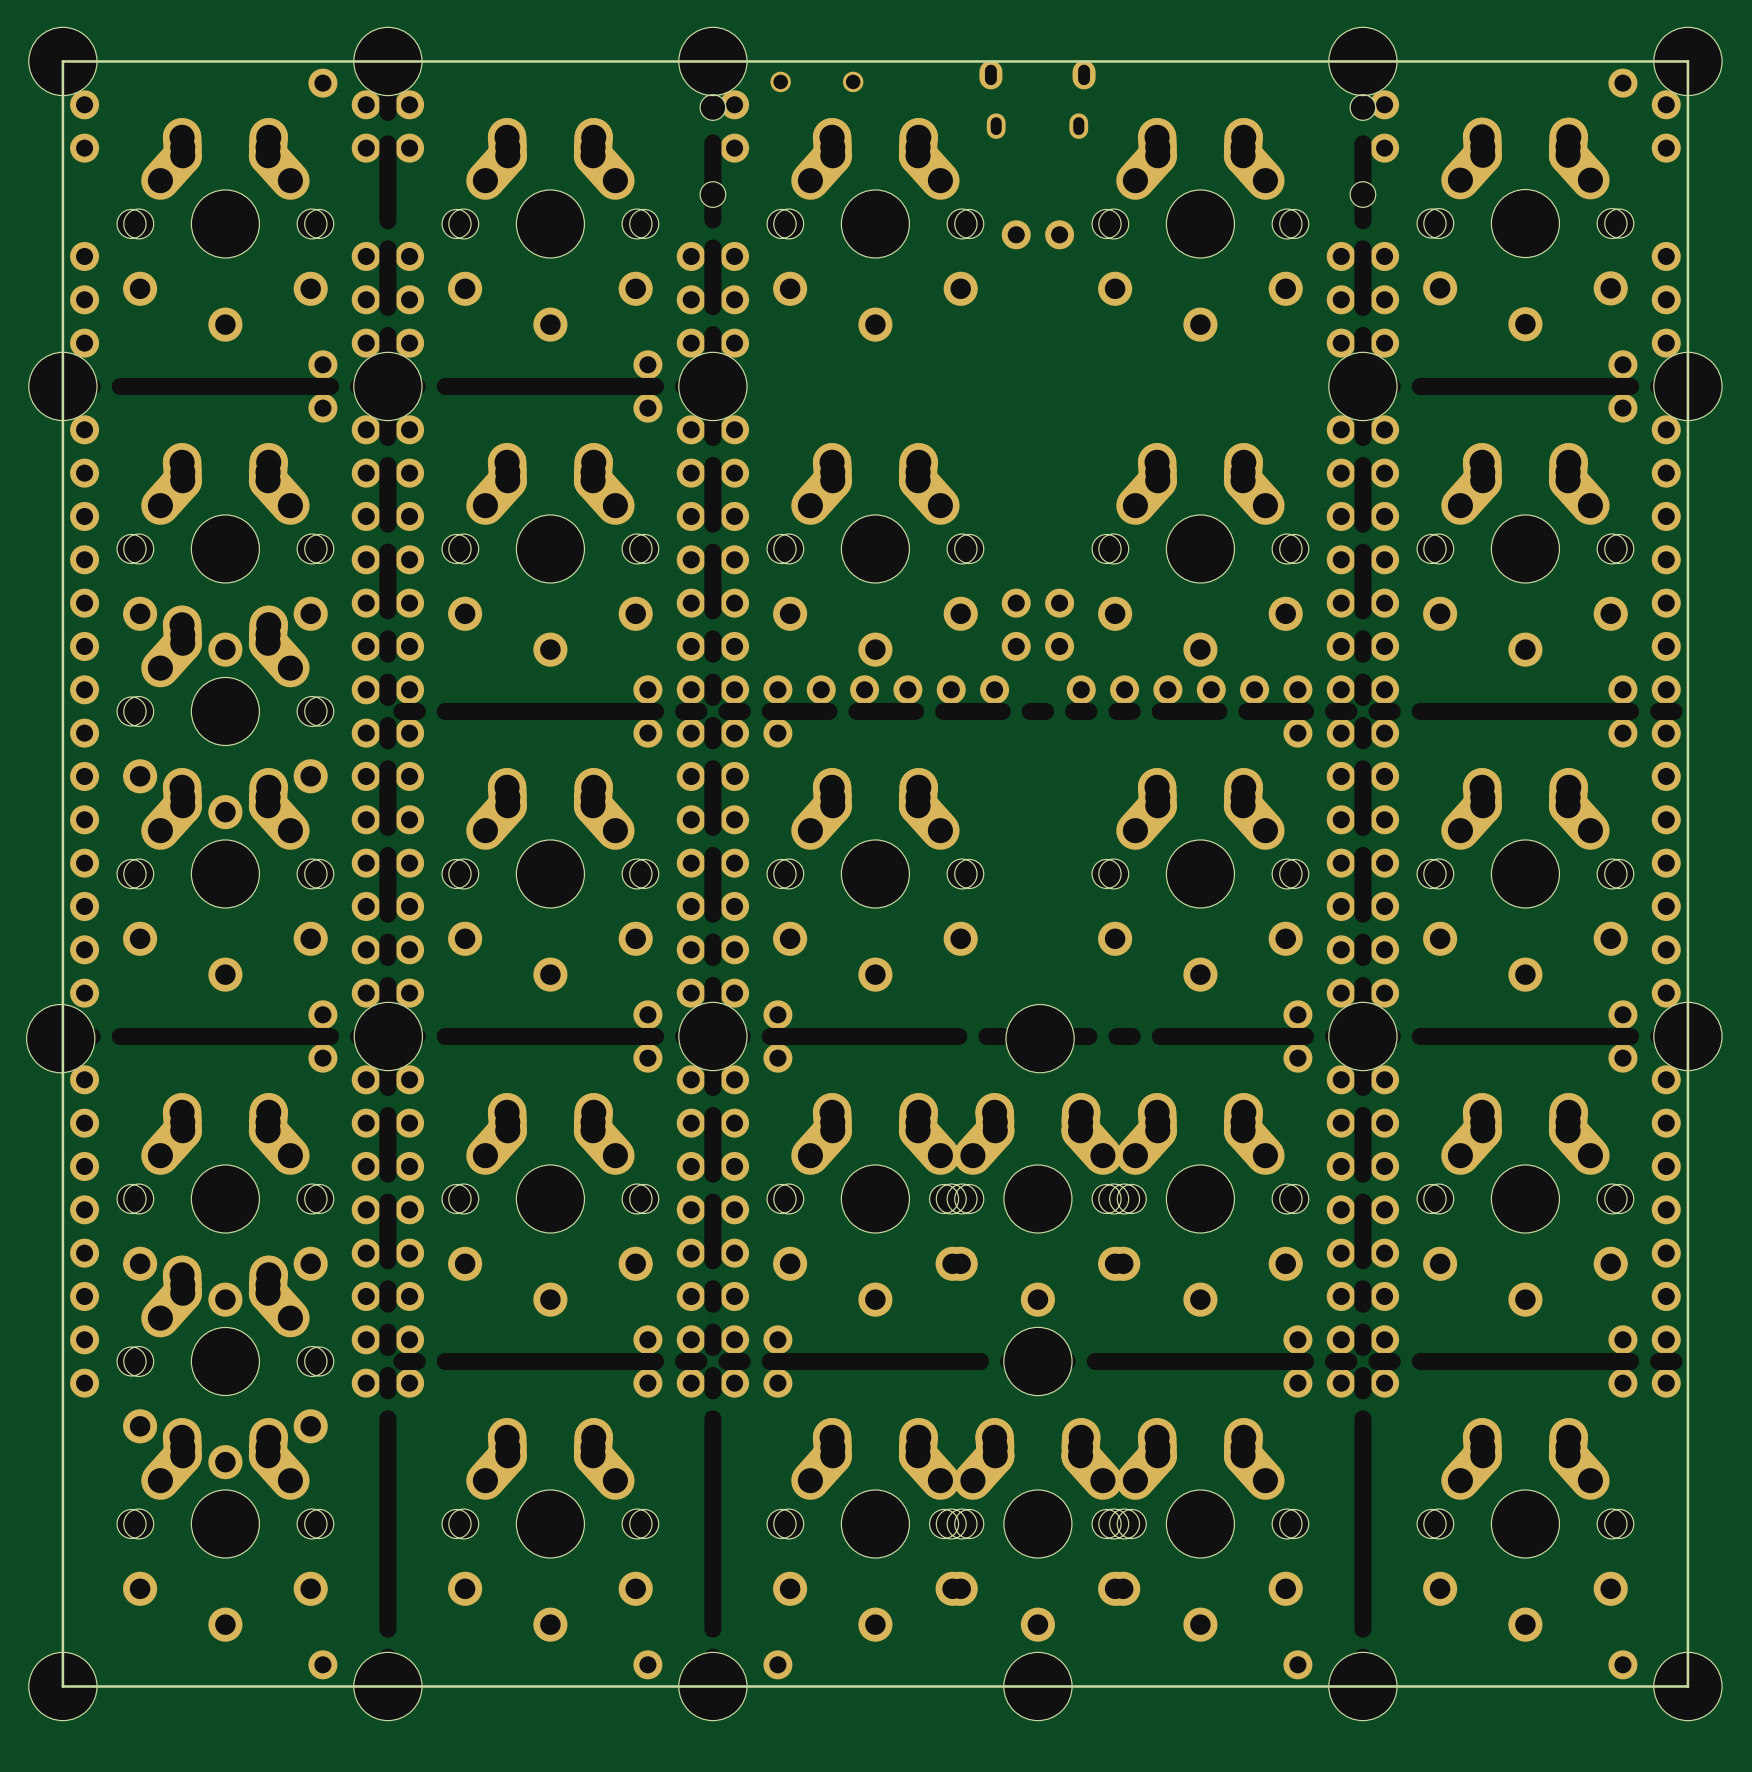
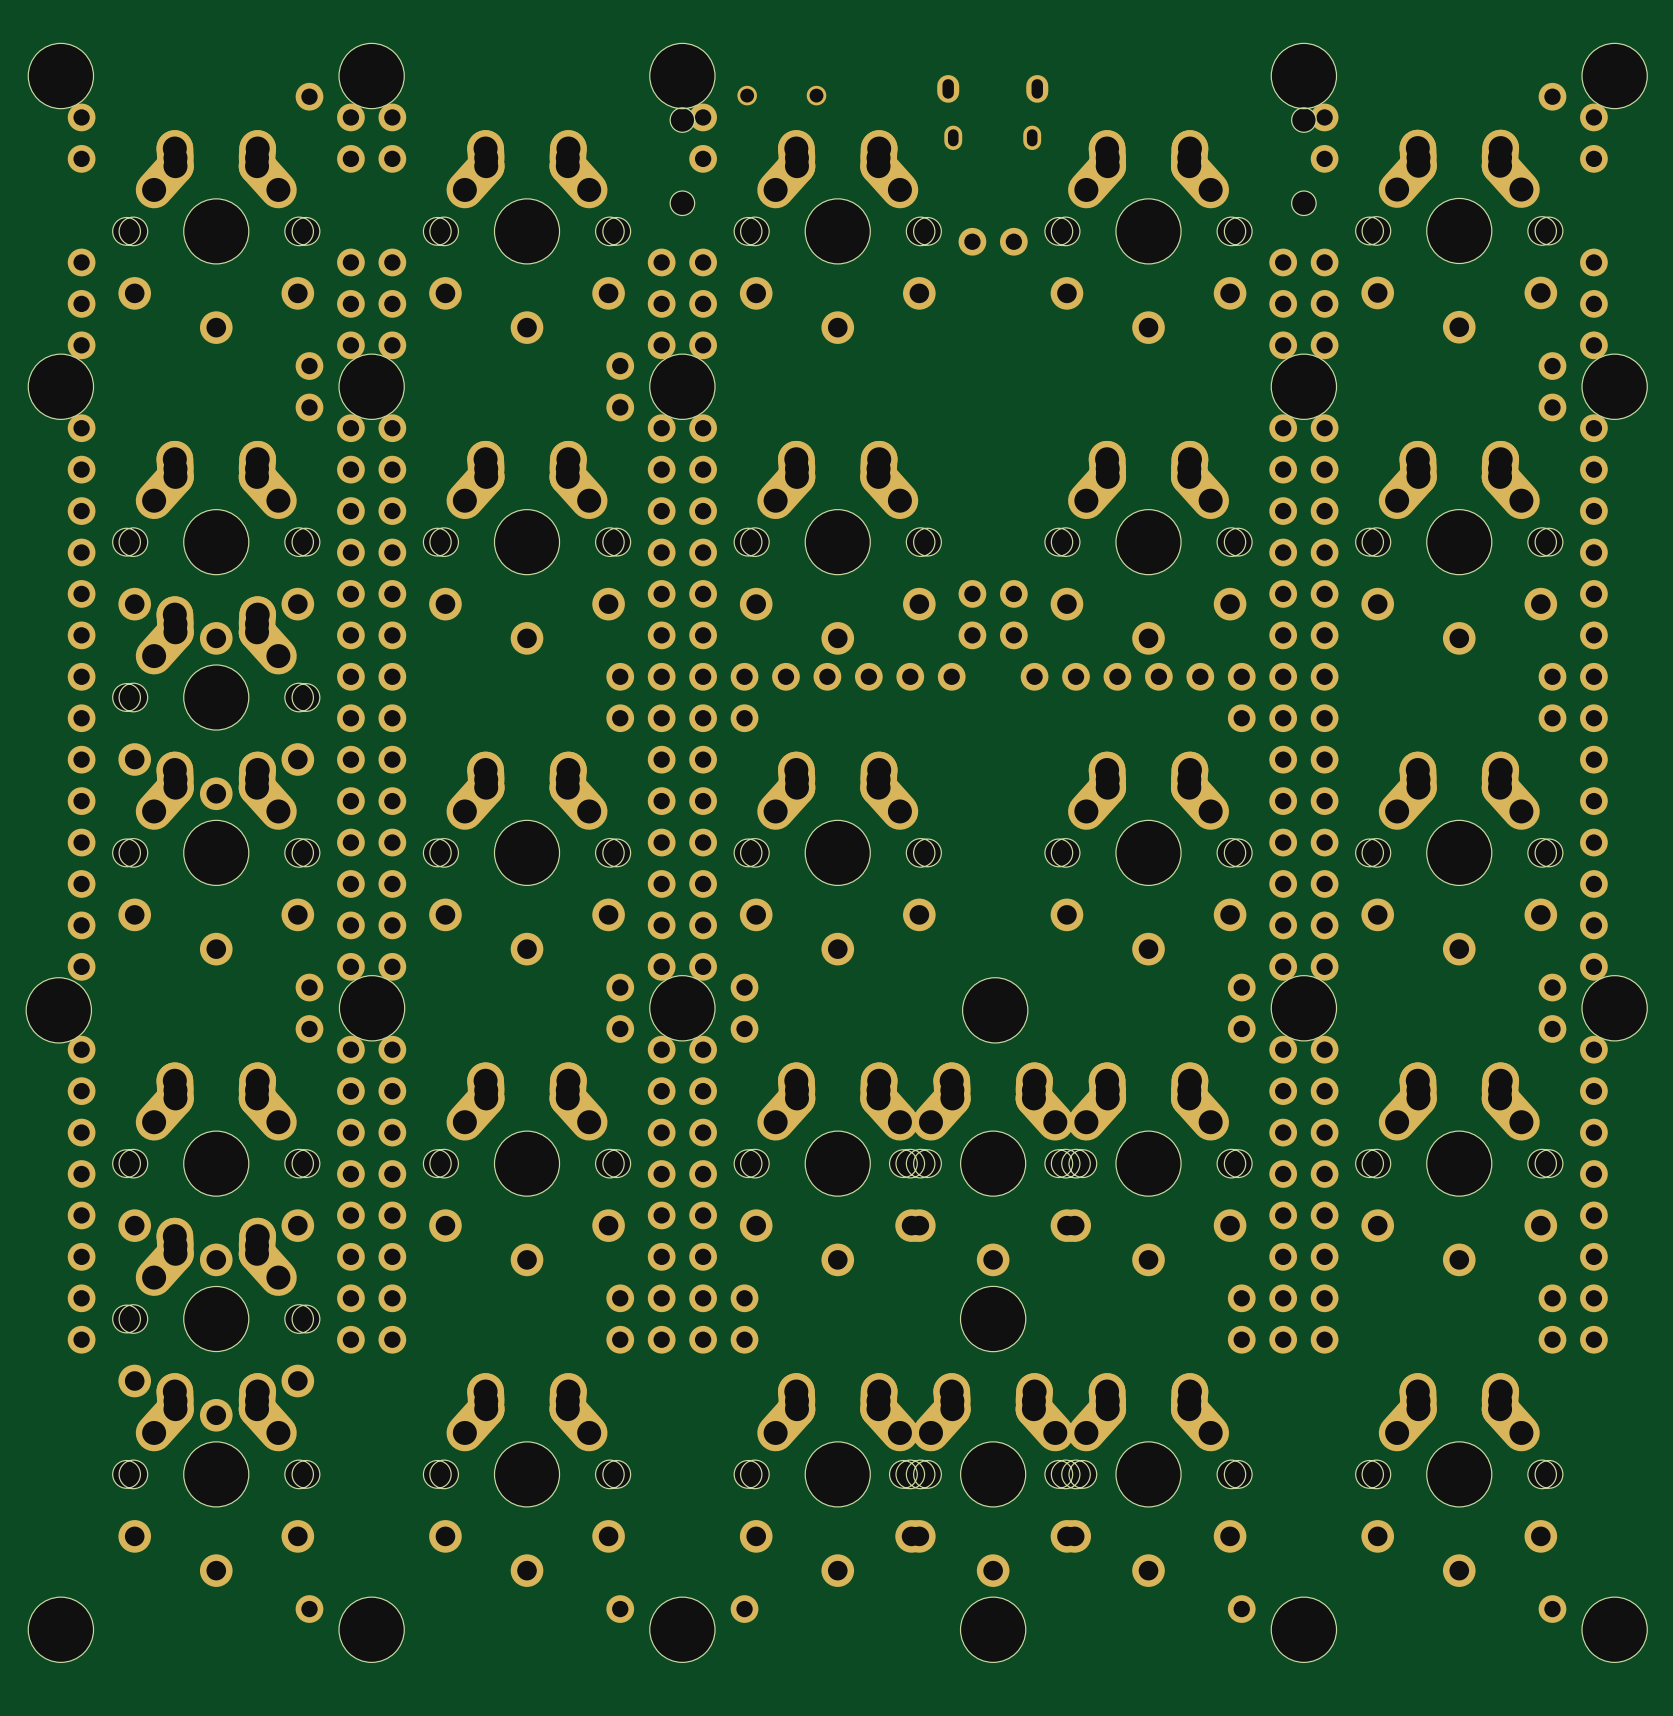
board edge: (1687, 61) (1687, 1686) (62, 1686) (62, 61) (1687, 61) -> none
part: (387, 223) -> none
part: (712, 246) -> none
part: (1362, 247) -> none
part: (225, 386) -> none
part: (550, 386) -> none
part: (1525, 386) -> none
part: (387, 559) -> none
part: (712, 559) -> none
part: (1362, 559) -> none
part: (550, 711) -> none
part: (864, 711) -> none
part: (1037, 711) -> none
part: (1211, 711) -> none
part: (1525, 711) -> none
part: (387, 863) -> none
part: (712, 863) -> none
part: (1362, 863) -> none
part: (225, 1036) -> none
part: (550, 1036) -> none
part: (864, 1036) -> none
part: (1211, 1036) -> none
part: (1525, 1036) -> none
part: (387, 1209) -> none
part: (712, 1209) -> none
part: (1362, 1209) -> none
part: (550, 1361) -> none
part: (875, 1361) -> none
part: (1200, 1361) -> none
part: (1525, 1361) -> none
part: (387, 1523) -> none
part: (712, 1523) -> none
part: (1362, 1523) -> none

